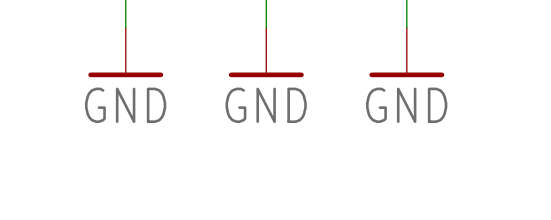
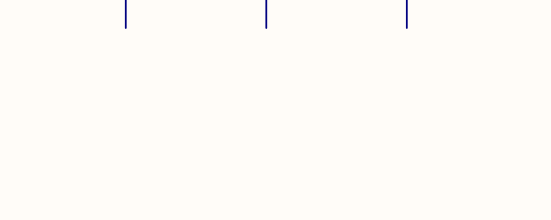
power symbol: GND (125, 52) -> none
power symbol: GND (266, 52) -> none
power symbol: GND (406, 52) -> none

